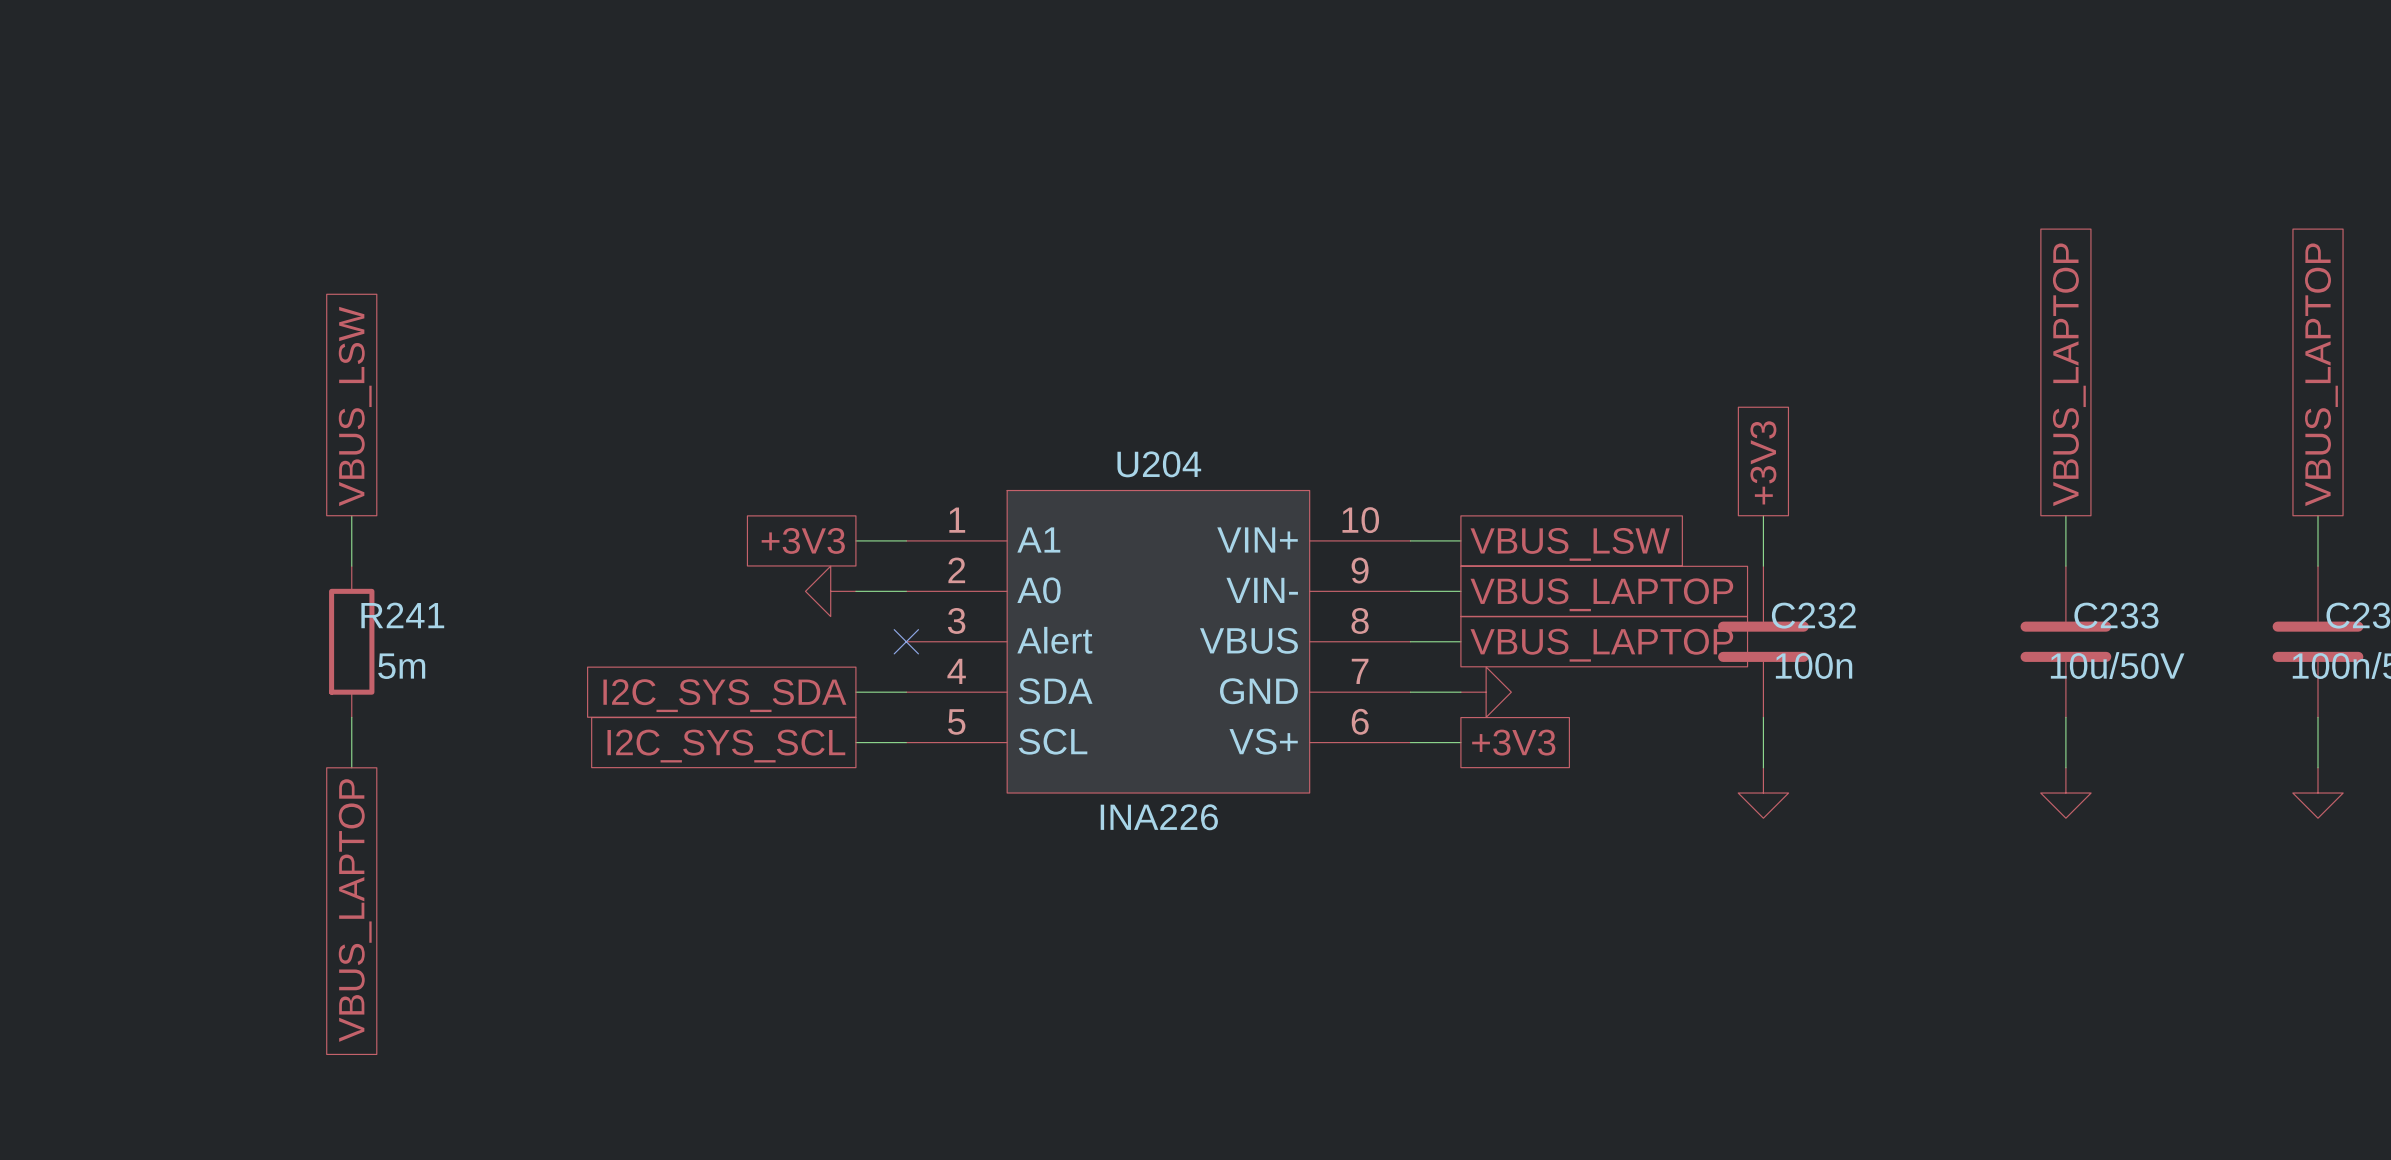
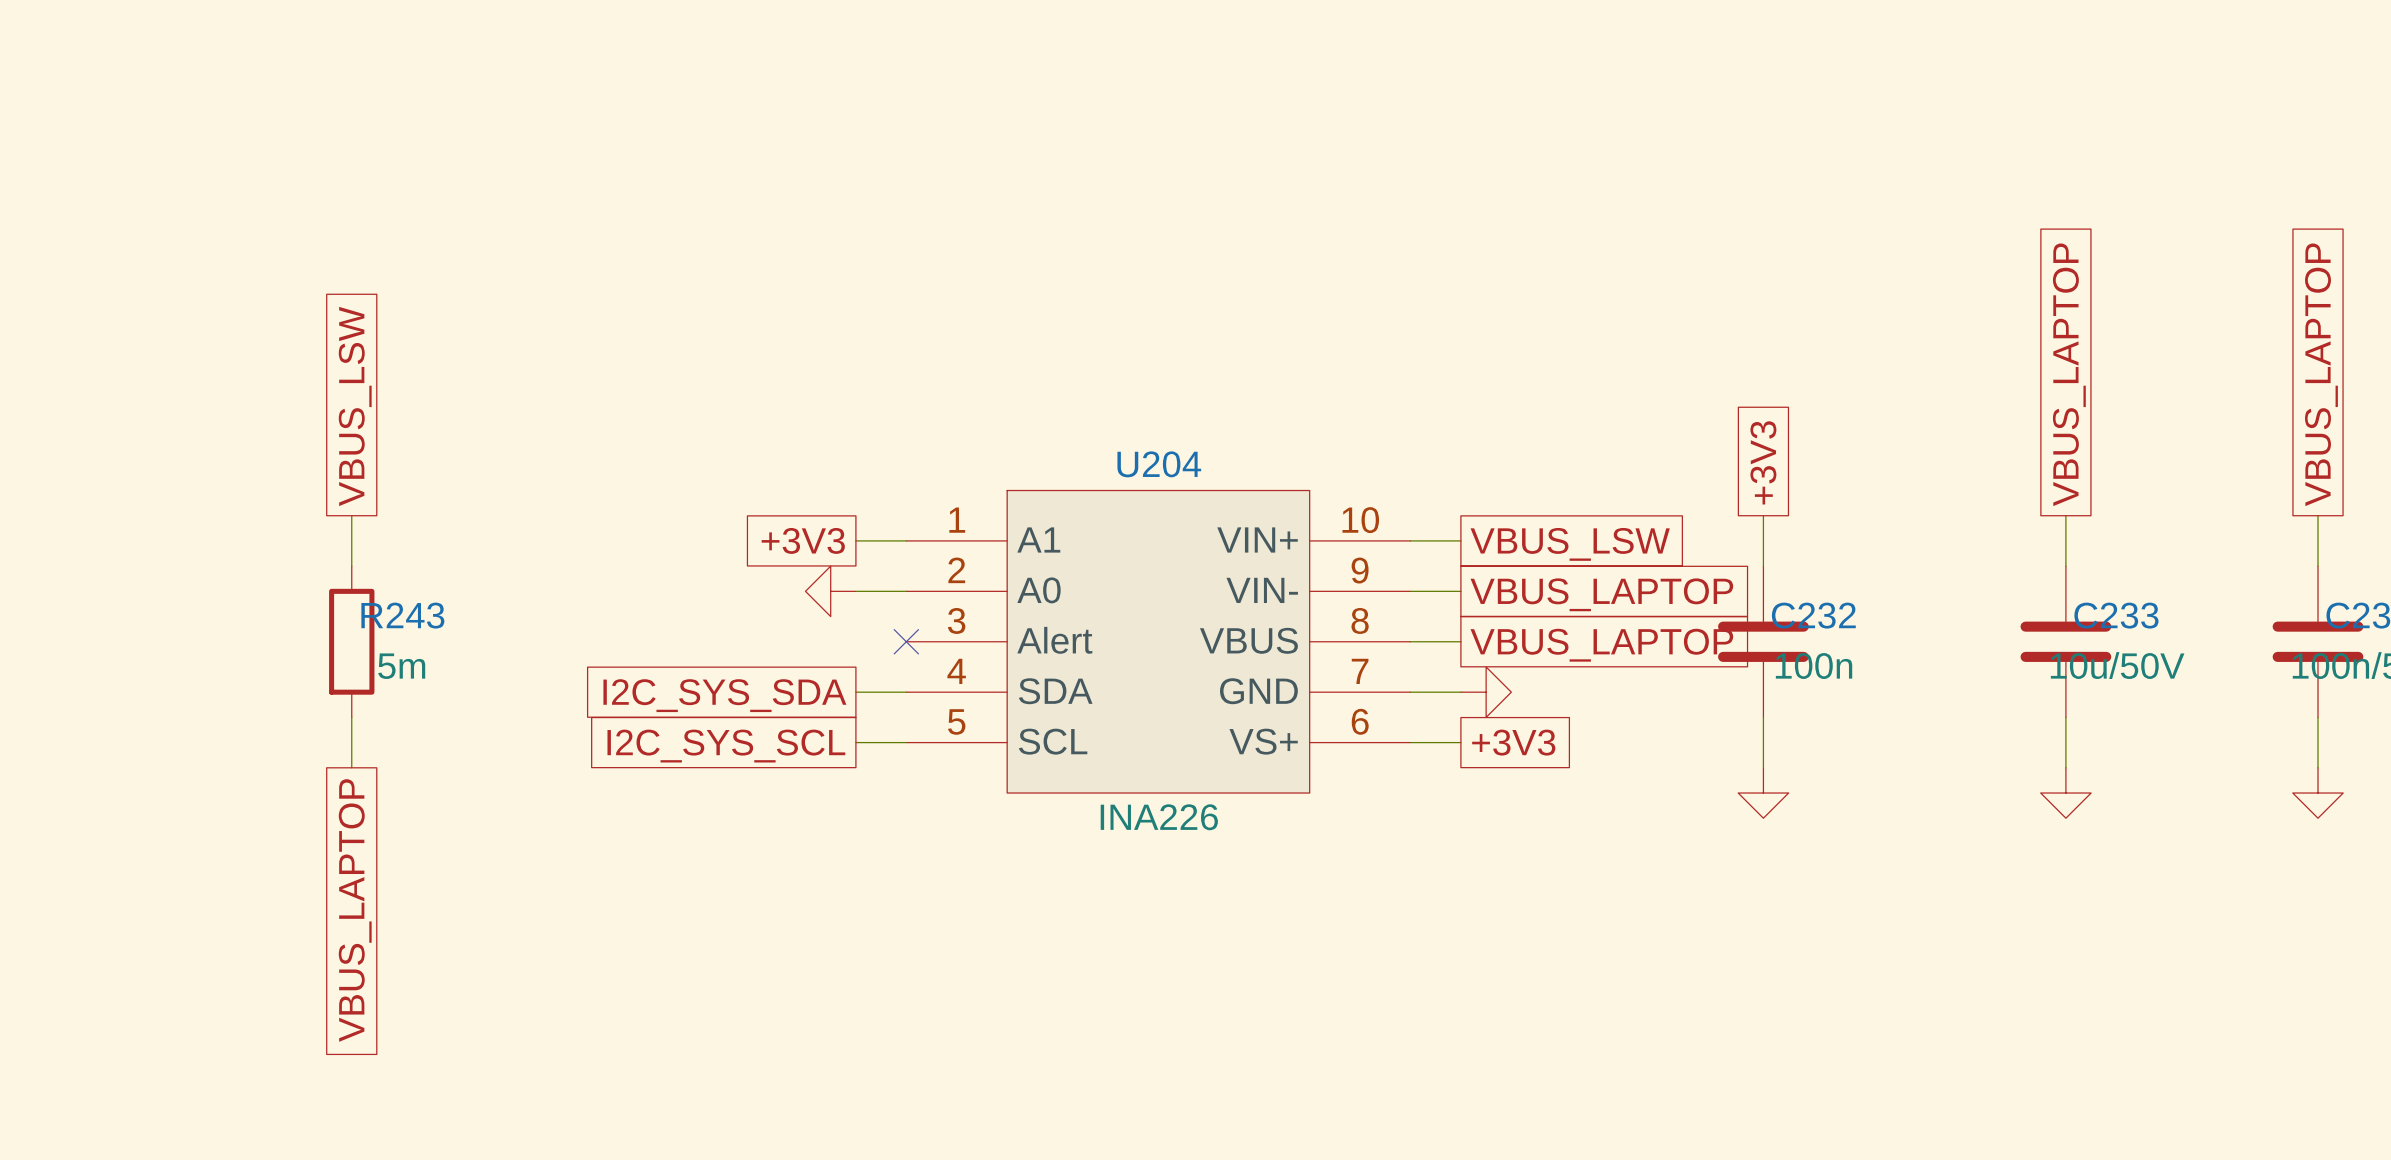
R241 name: R241 (402, 615) -> R243 (402, 615)

